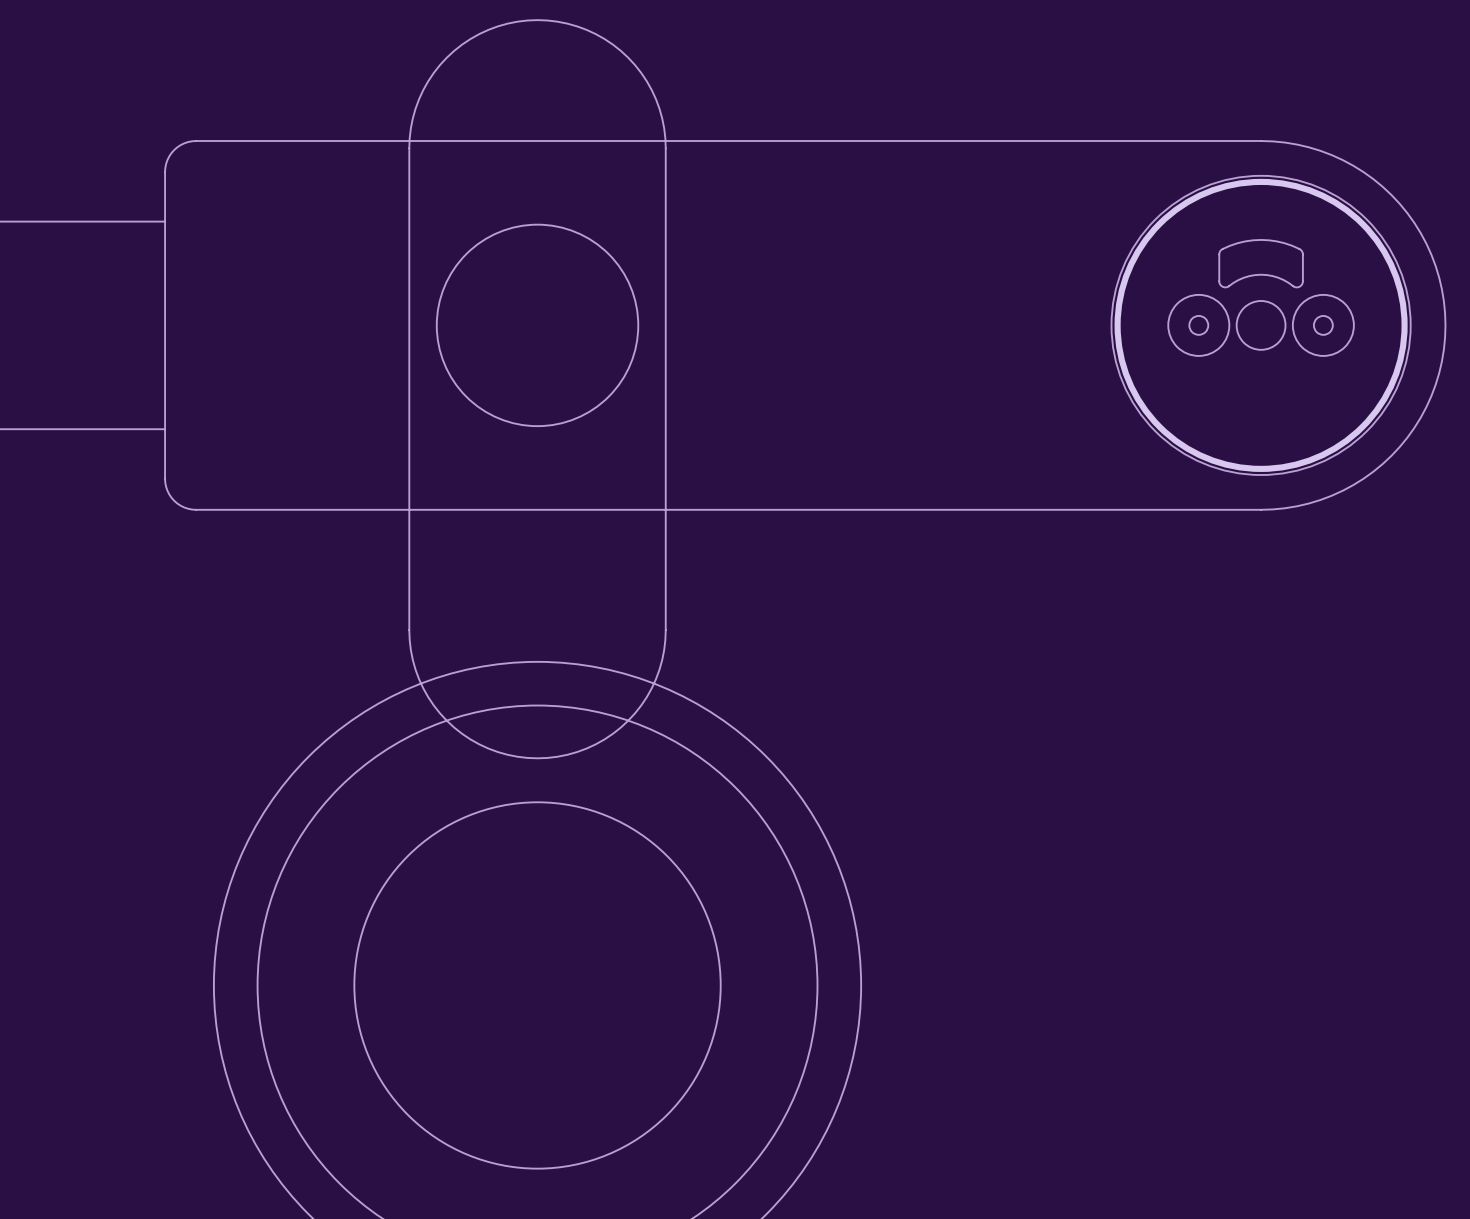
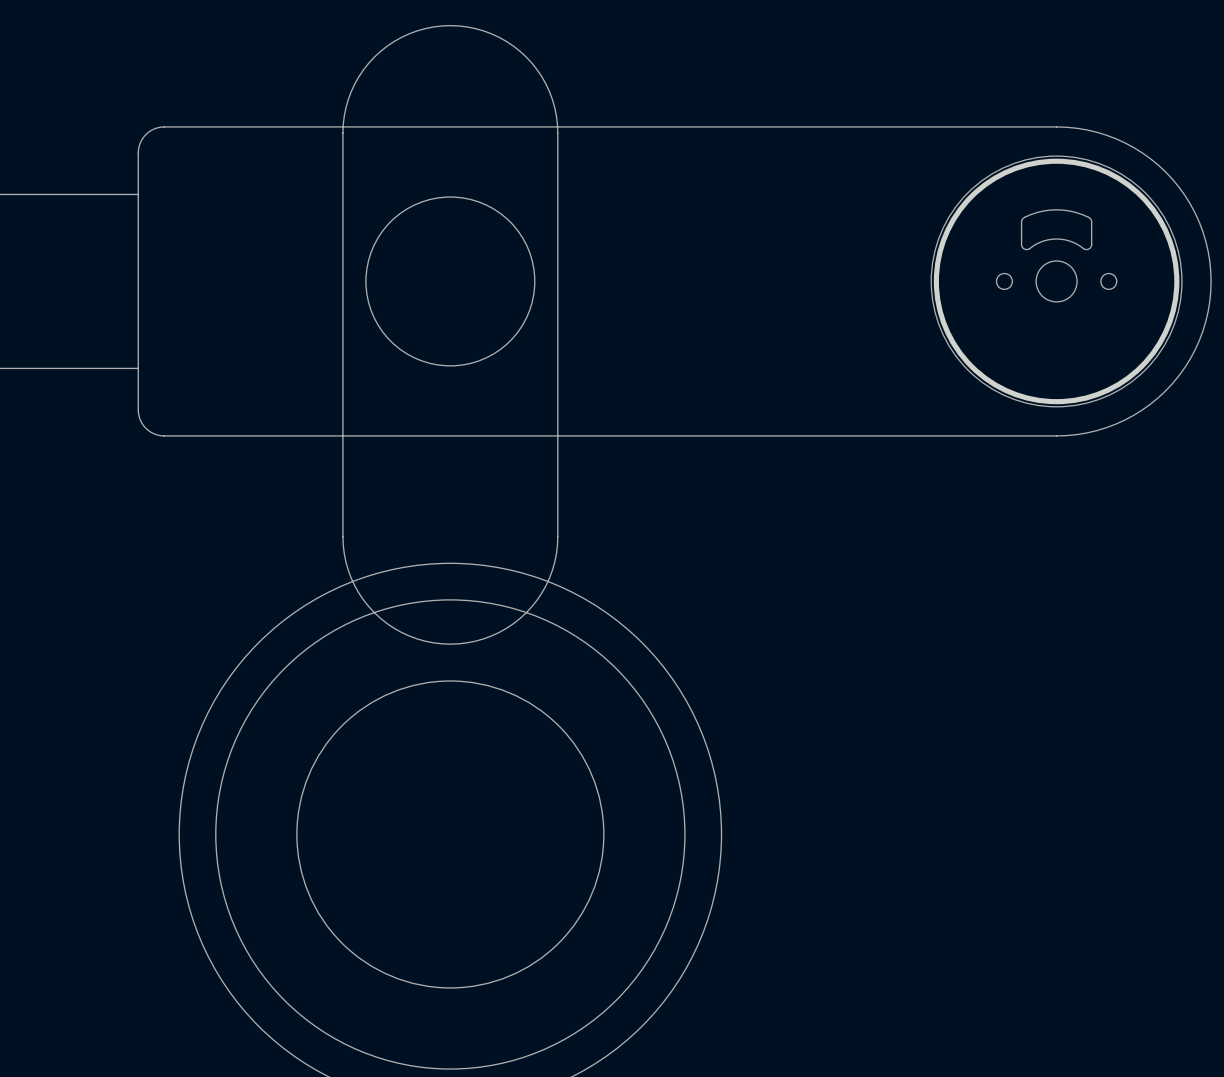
drawing: [1167, 294, 1230, 357] -> none
drawing: [1292, 294, 1355, 357] -> none

